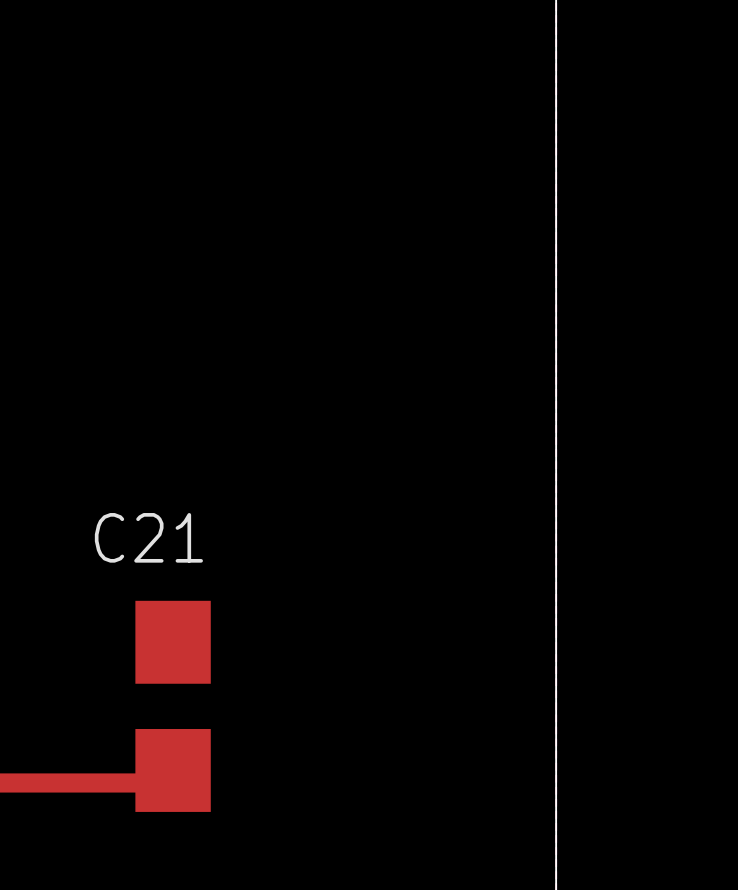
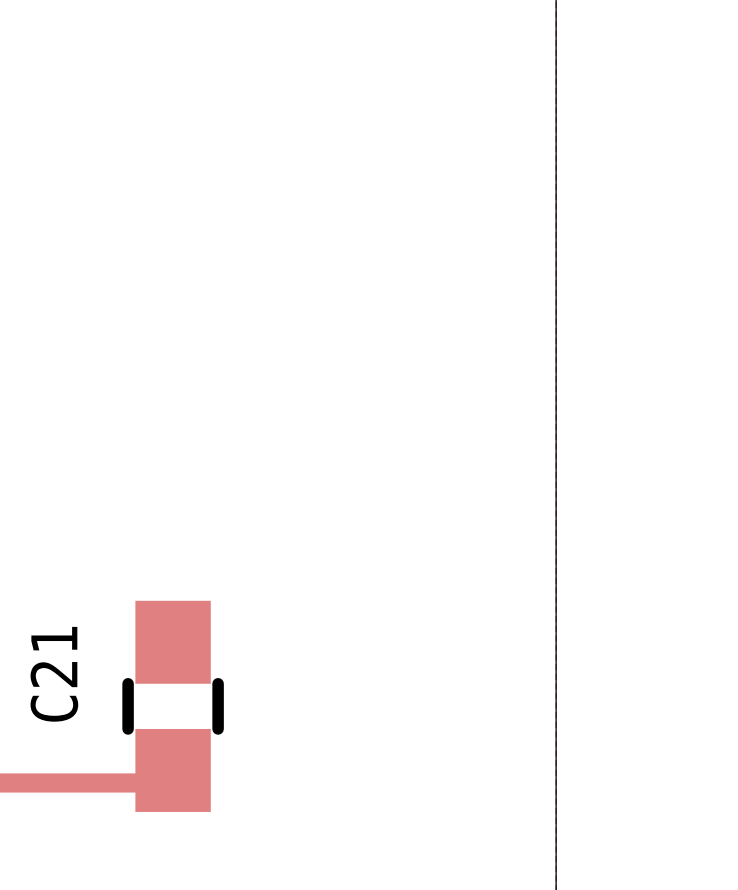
C21 footprint: [135, 600, 211, 812] -> [122, 600, 224, 812]

